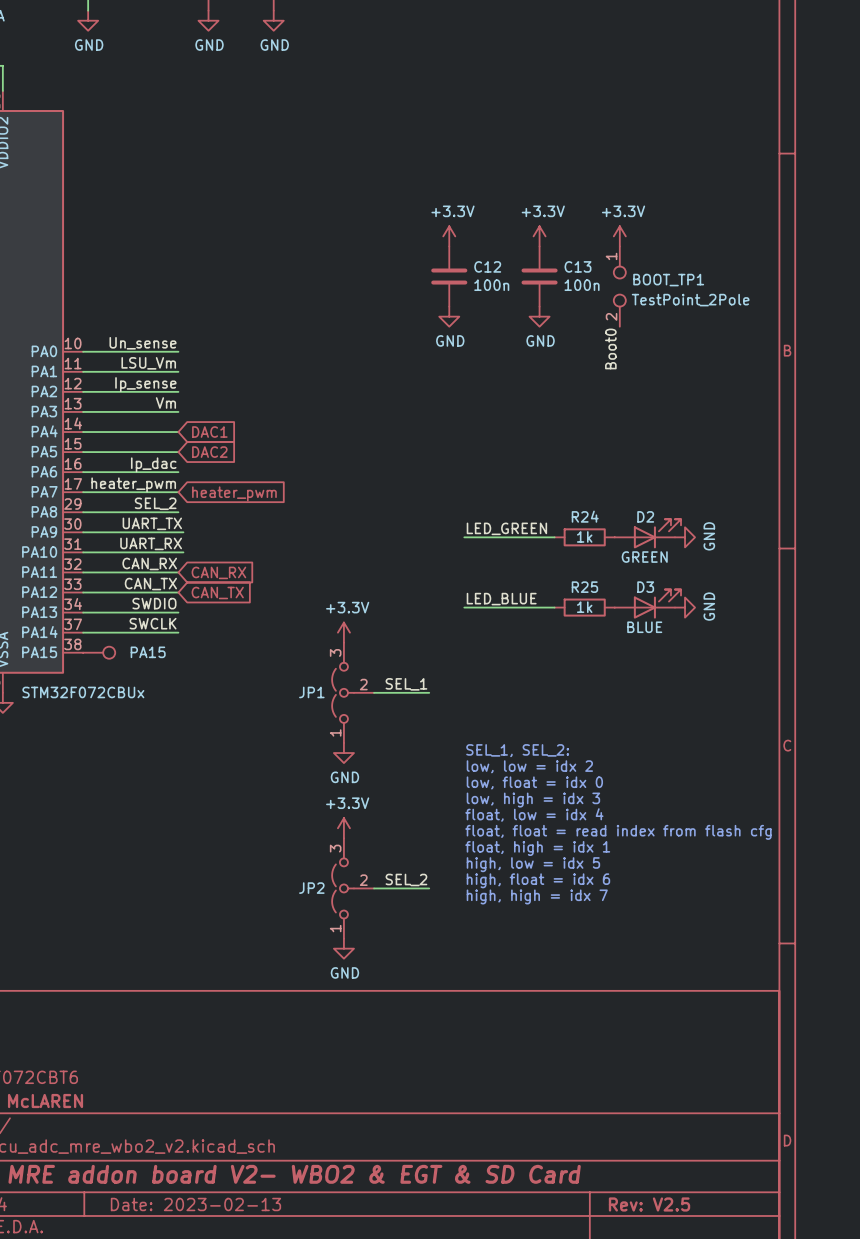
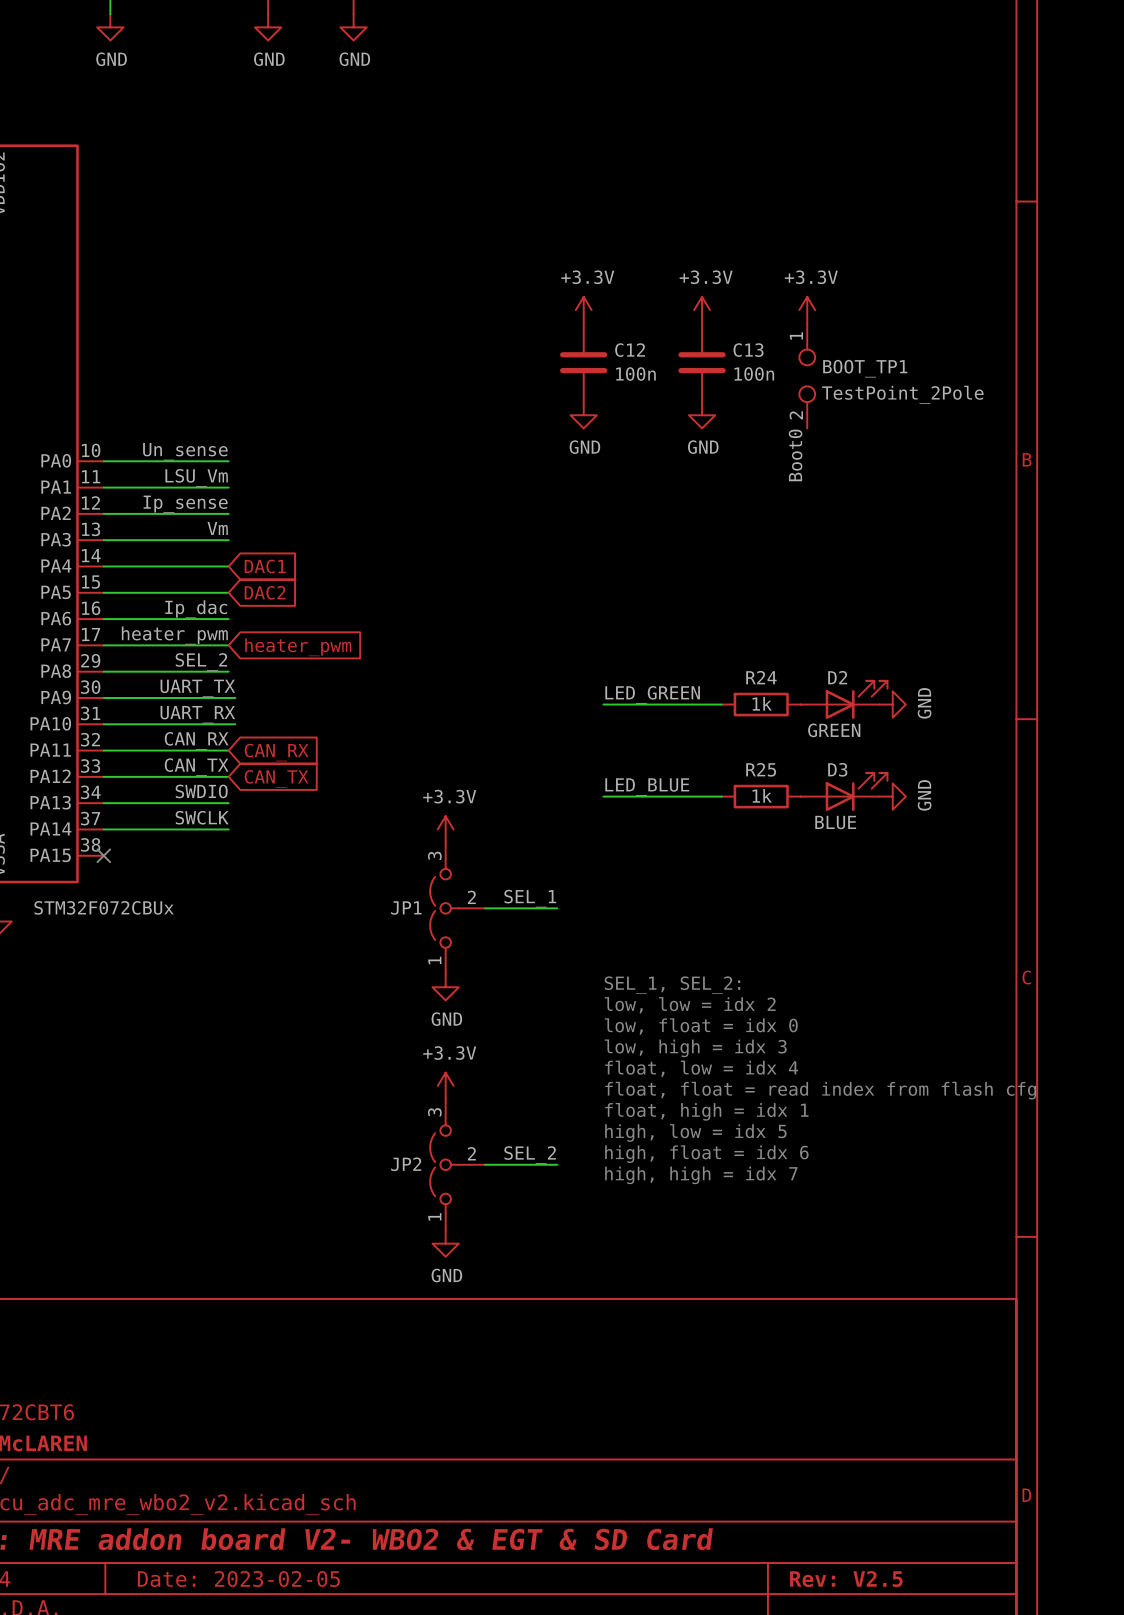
no-connect mark: none -> (103, 855)
PA15: (99, 652) -> none
title block: Date: 2023-02-13 (195, 1204) -> Date: 2023-02-05 (238, 1579)

